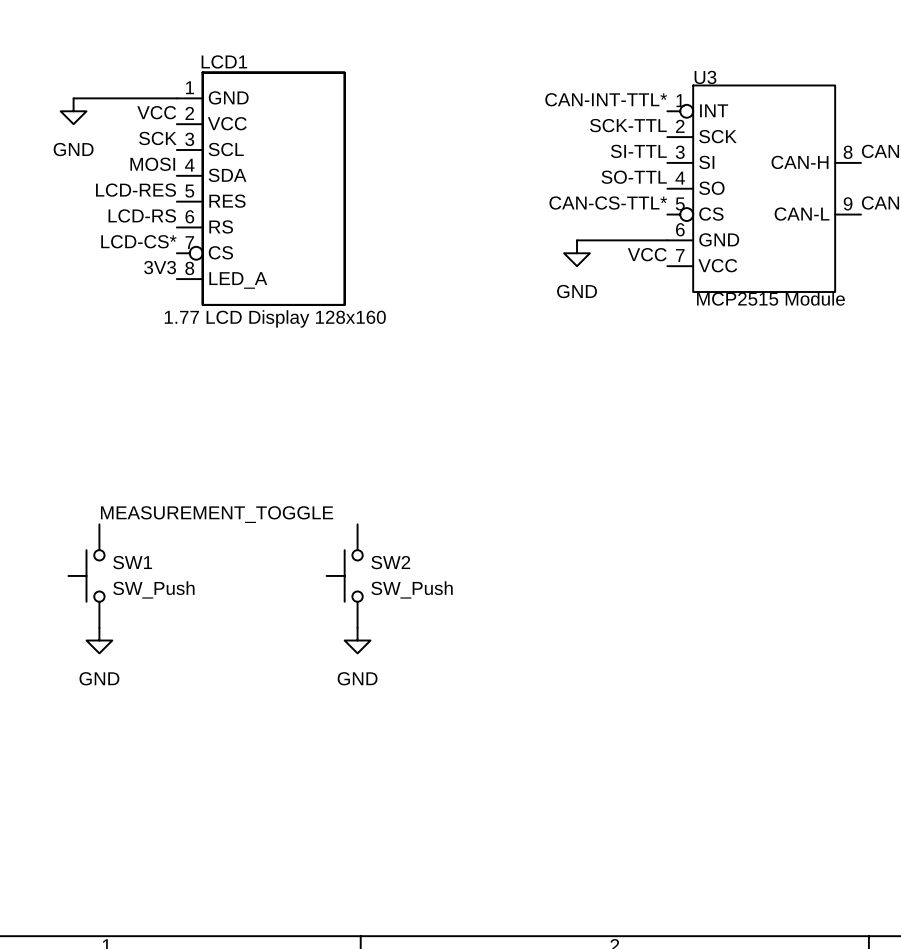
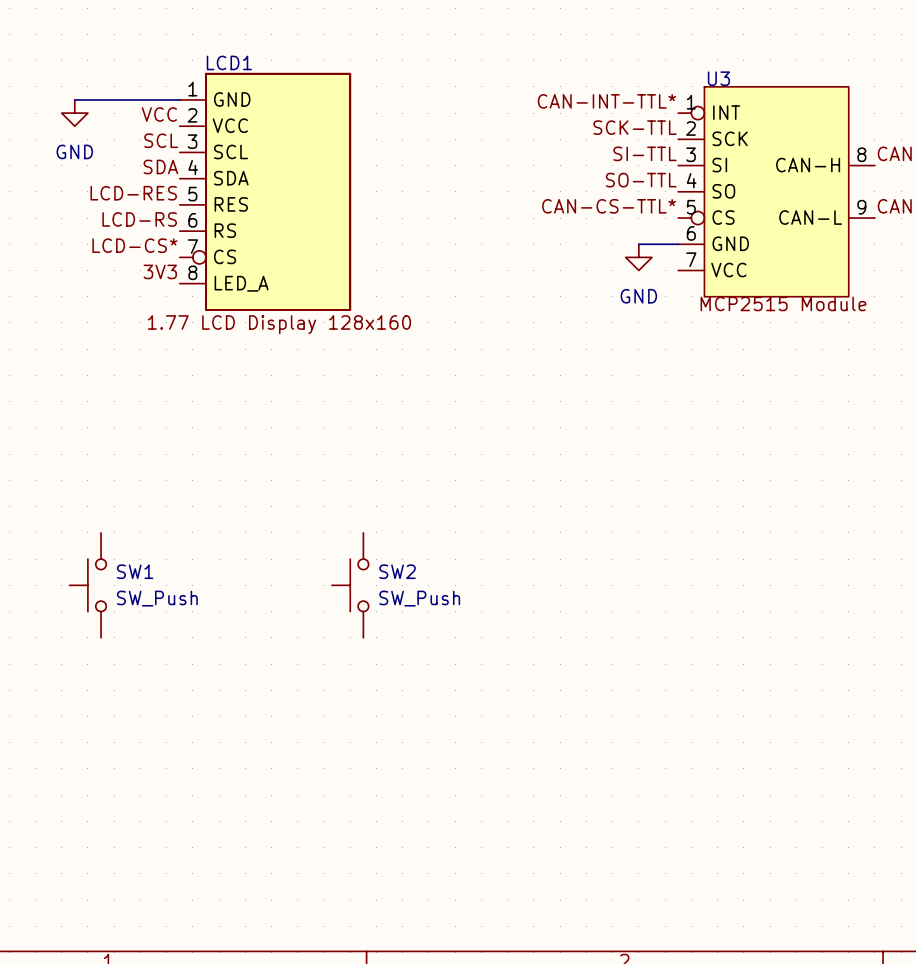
label: SCK (157, 138) -> SCL (161, 140)
label: MOSI (152, 164) -> SDA (160, 166)
wire: (577, 240) (628, 240) -> none
power symbol position: GND (577, 253) -> GND (638, 257)
label: VCC (647, 254) -> none
label: MEASUREMENT_TOGGLE (217, 514) -> none
power symbol: GND (99, 640) -> none
power symbol: GND (357, 640) -> none

